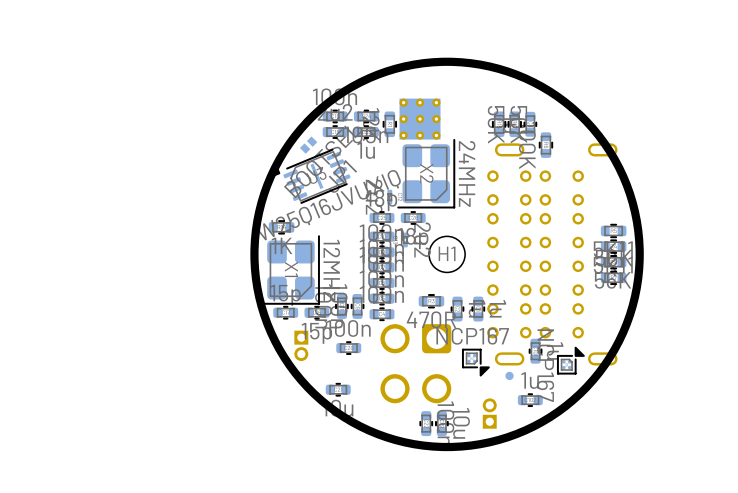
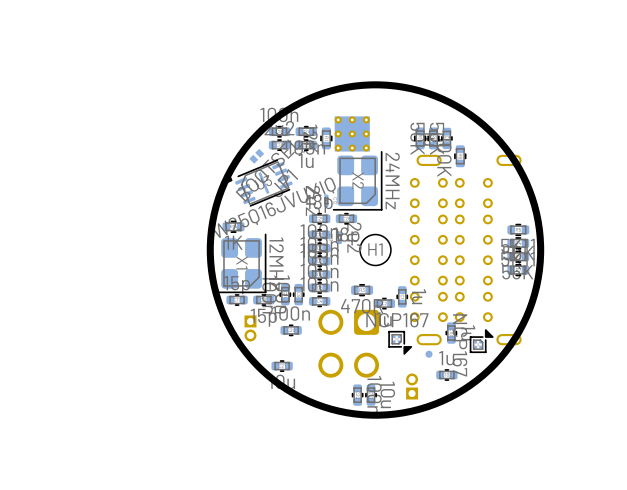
part rotation: 0° (457, 309) -> 90° clockwise (384, 303)

